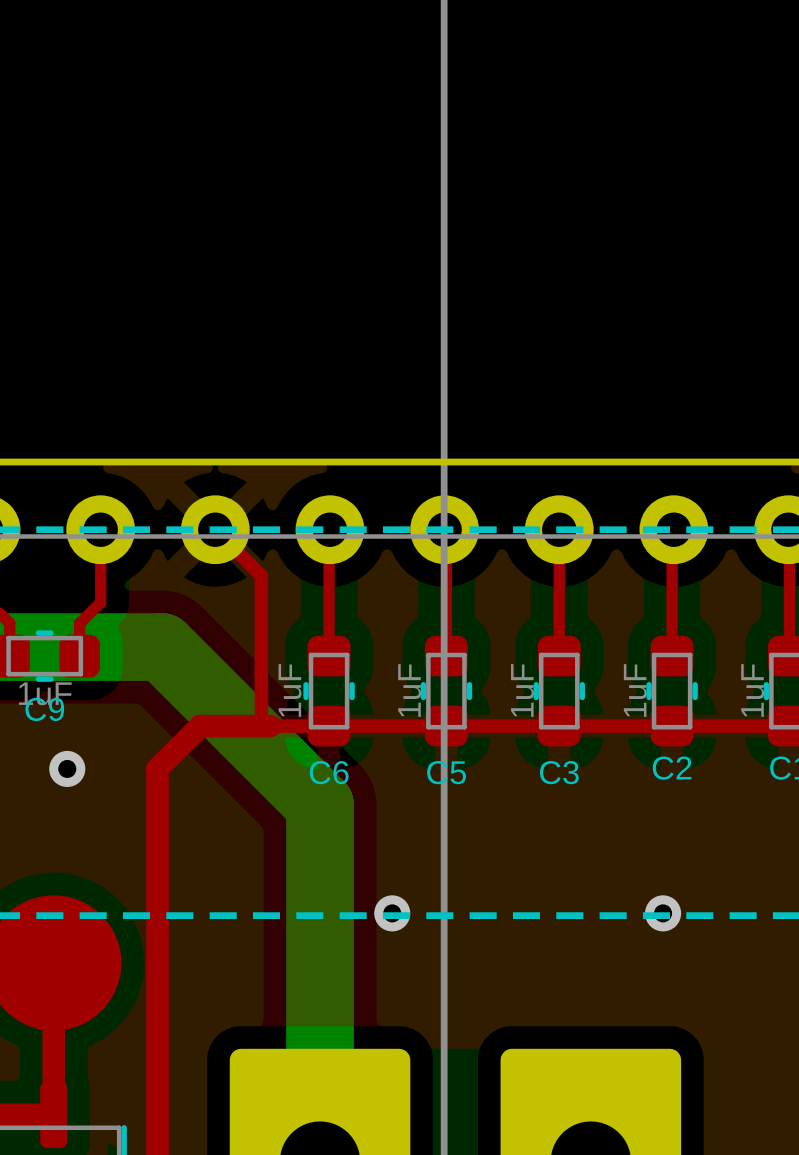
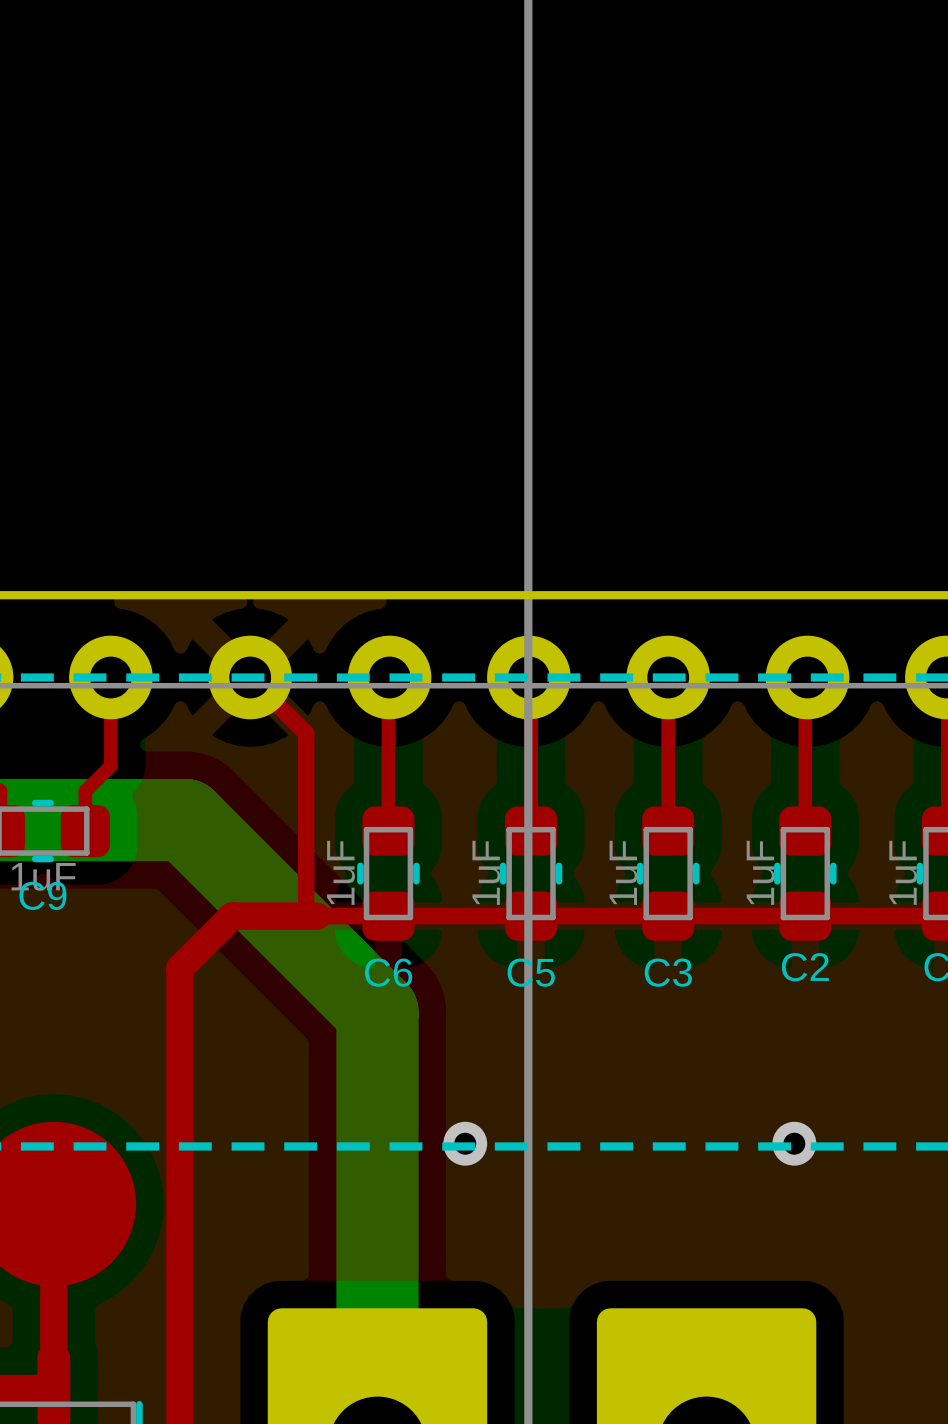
via: (67, 768) -> none

